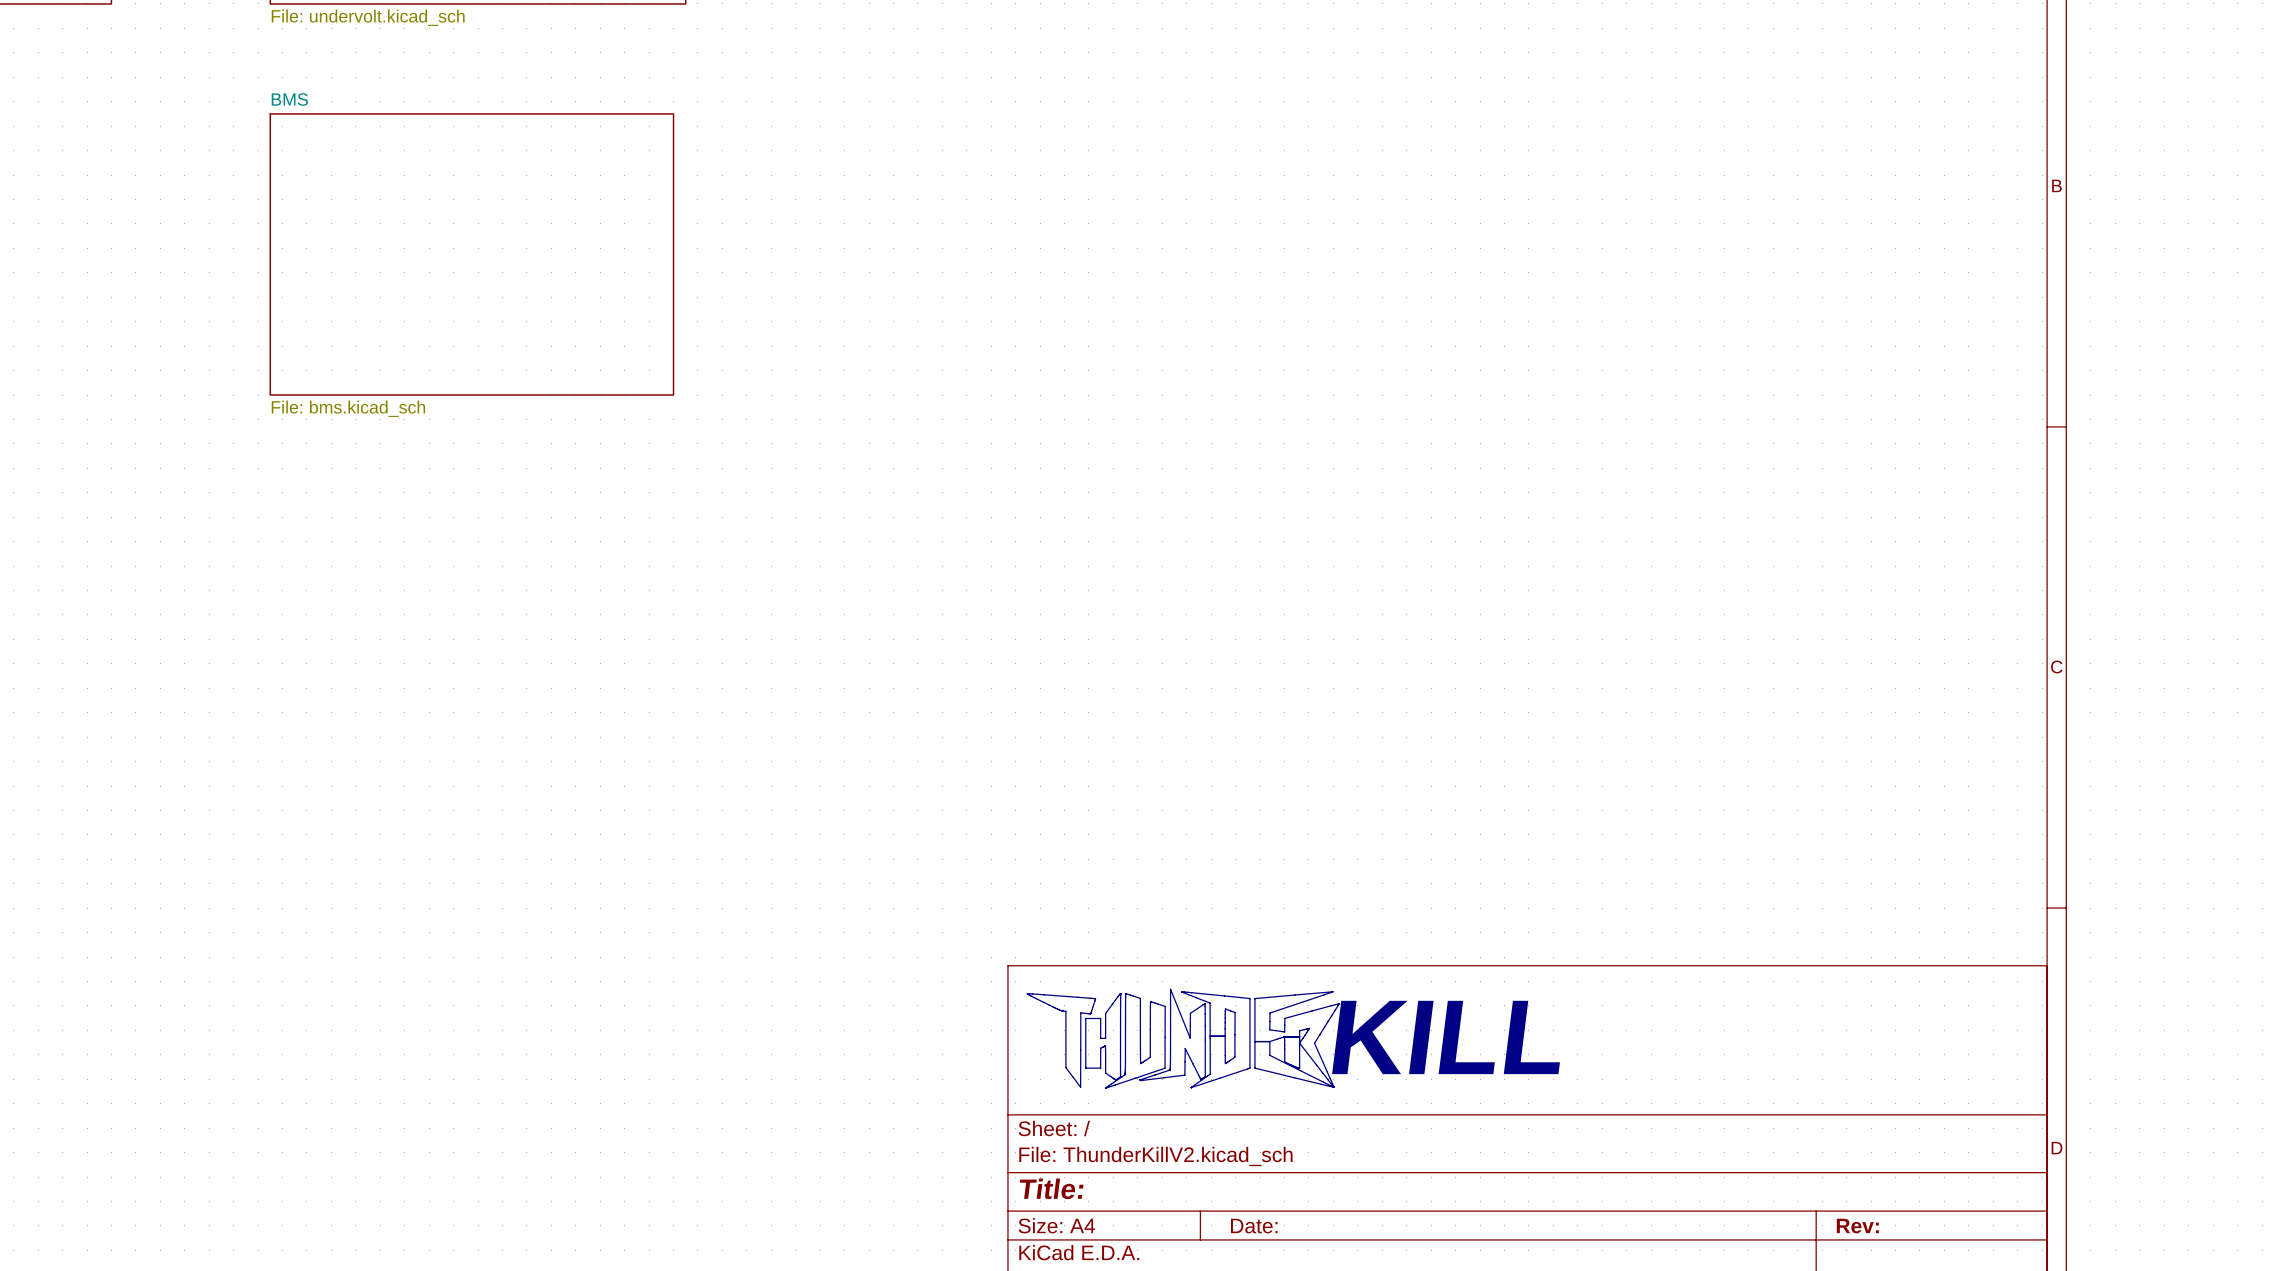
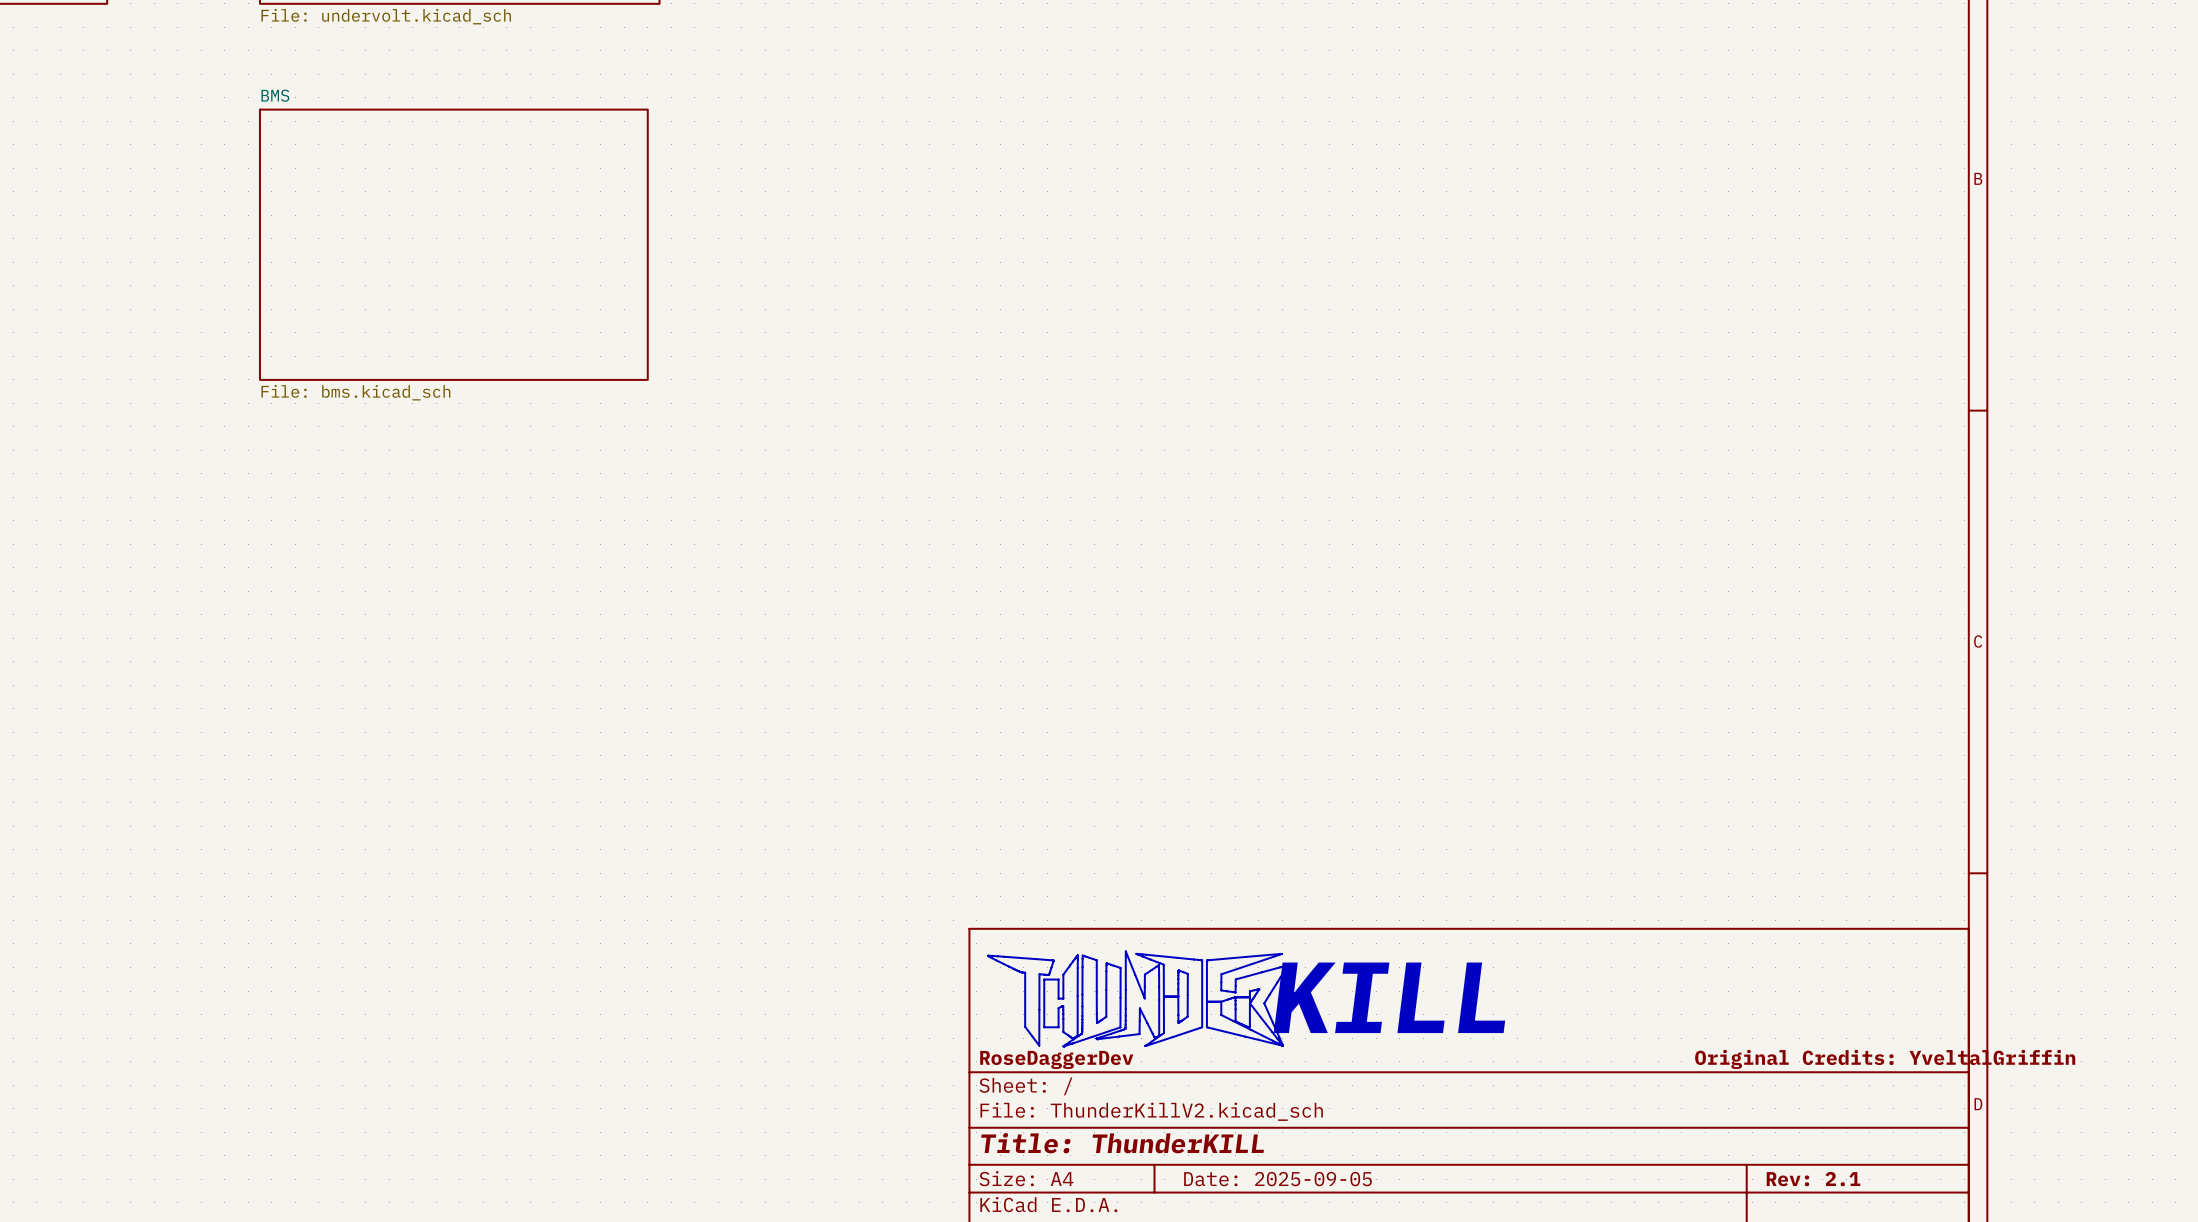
title block: none -> RoseDaggerDev Original Credits: YveltalGriffin (1527, 1059)
title block: Title: (1051, 1188) -> Title: ThunderKILL (1122, 1143)
title block: Date: (1254, 1226) -> Date: 2025-09-05 (1277, 1179)
title block: Rev: (1857, 1226) -> Rev: 2.1 (1813, 1179)

